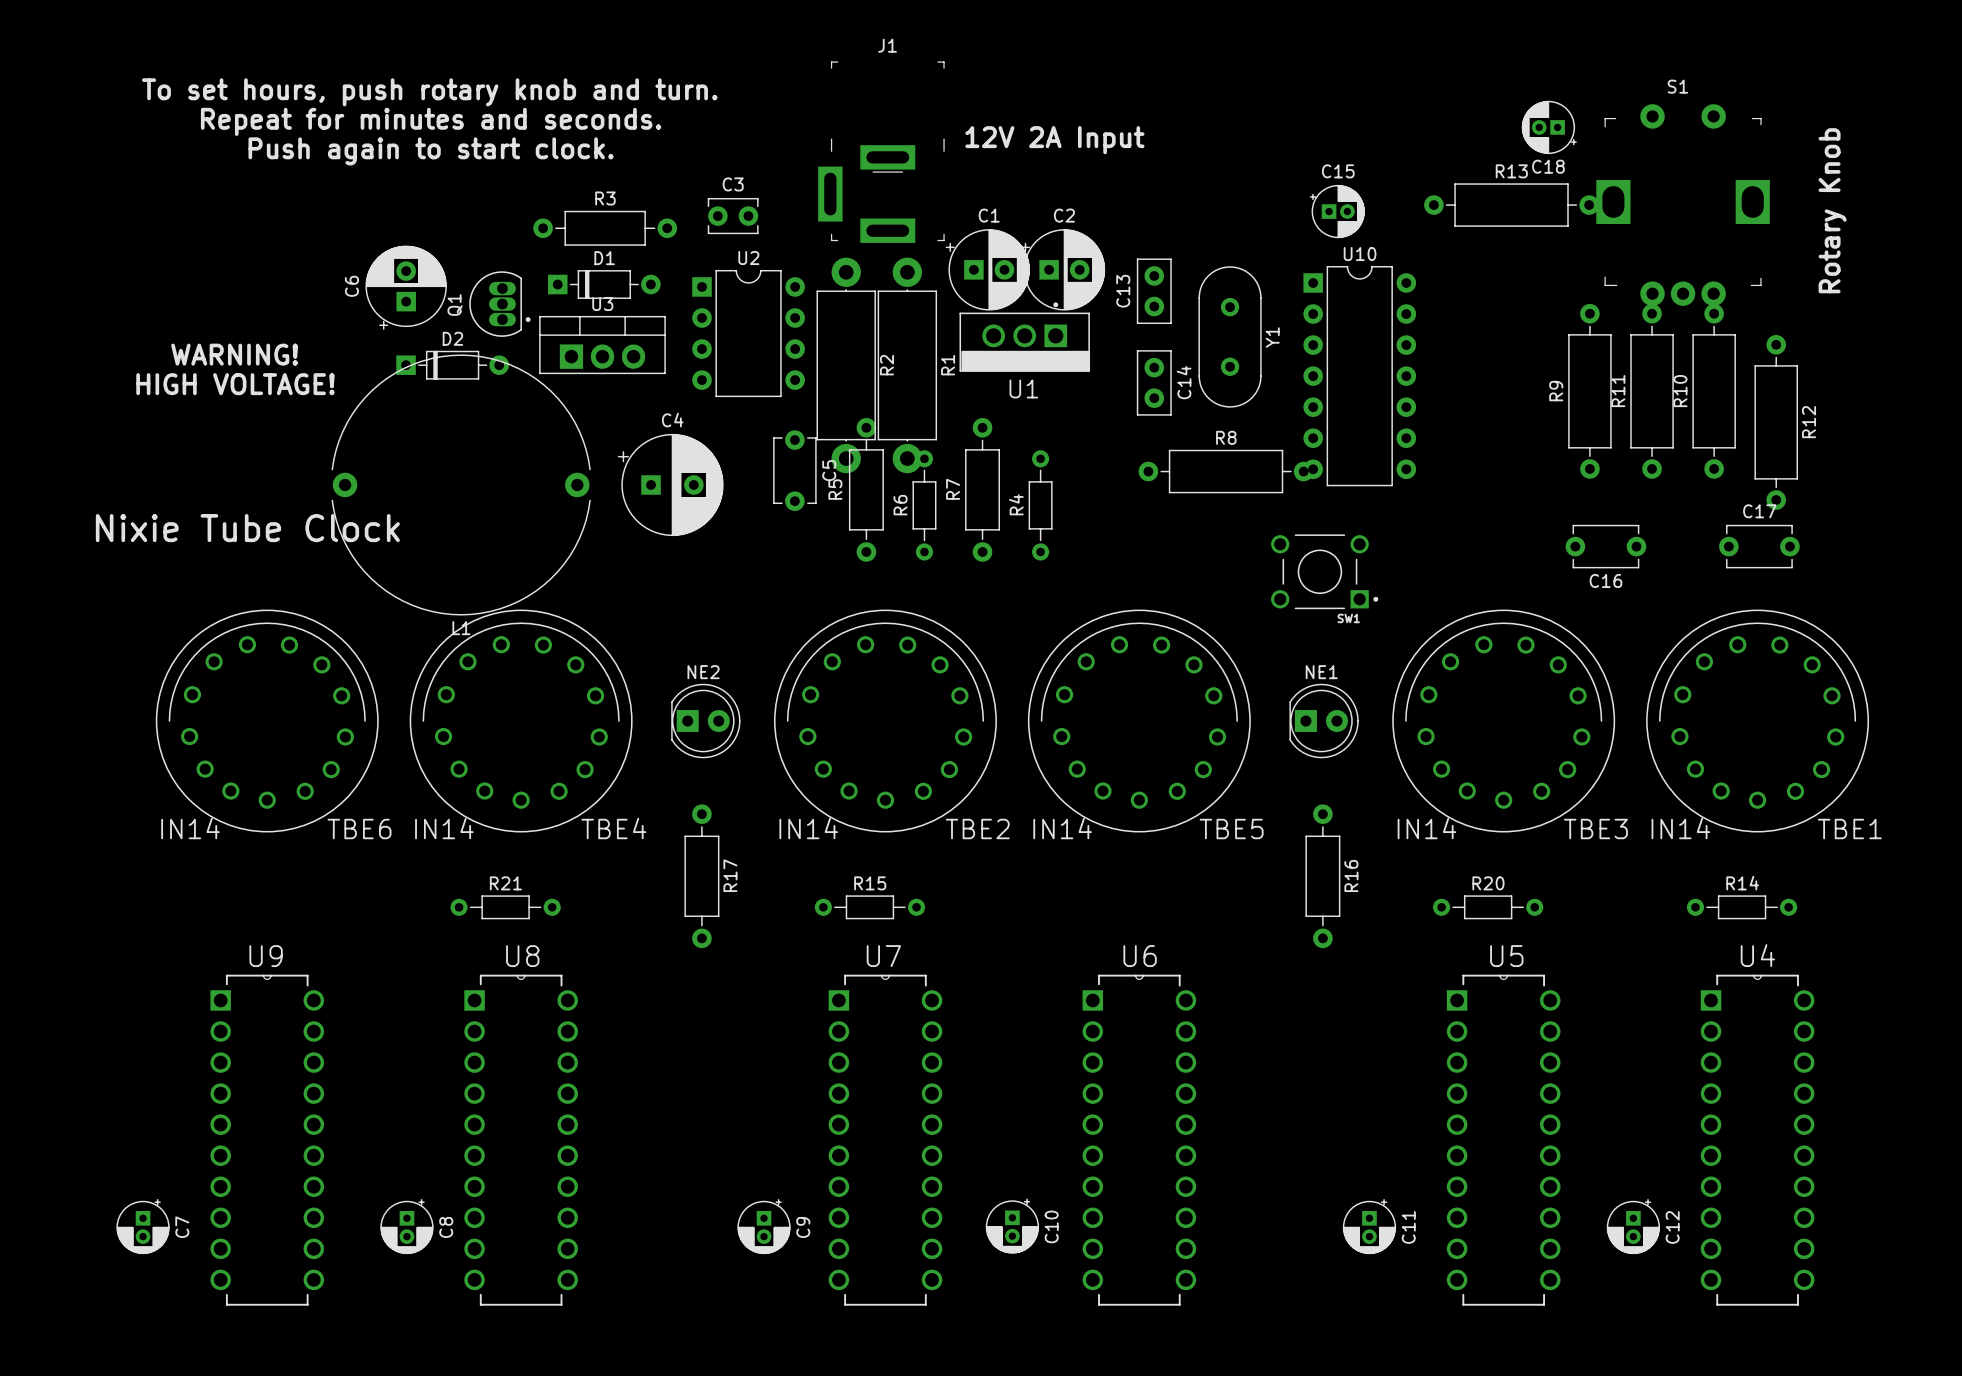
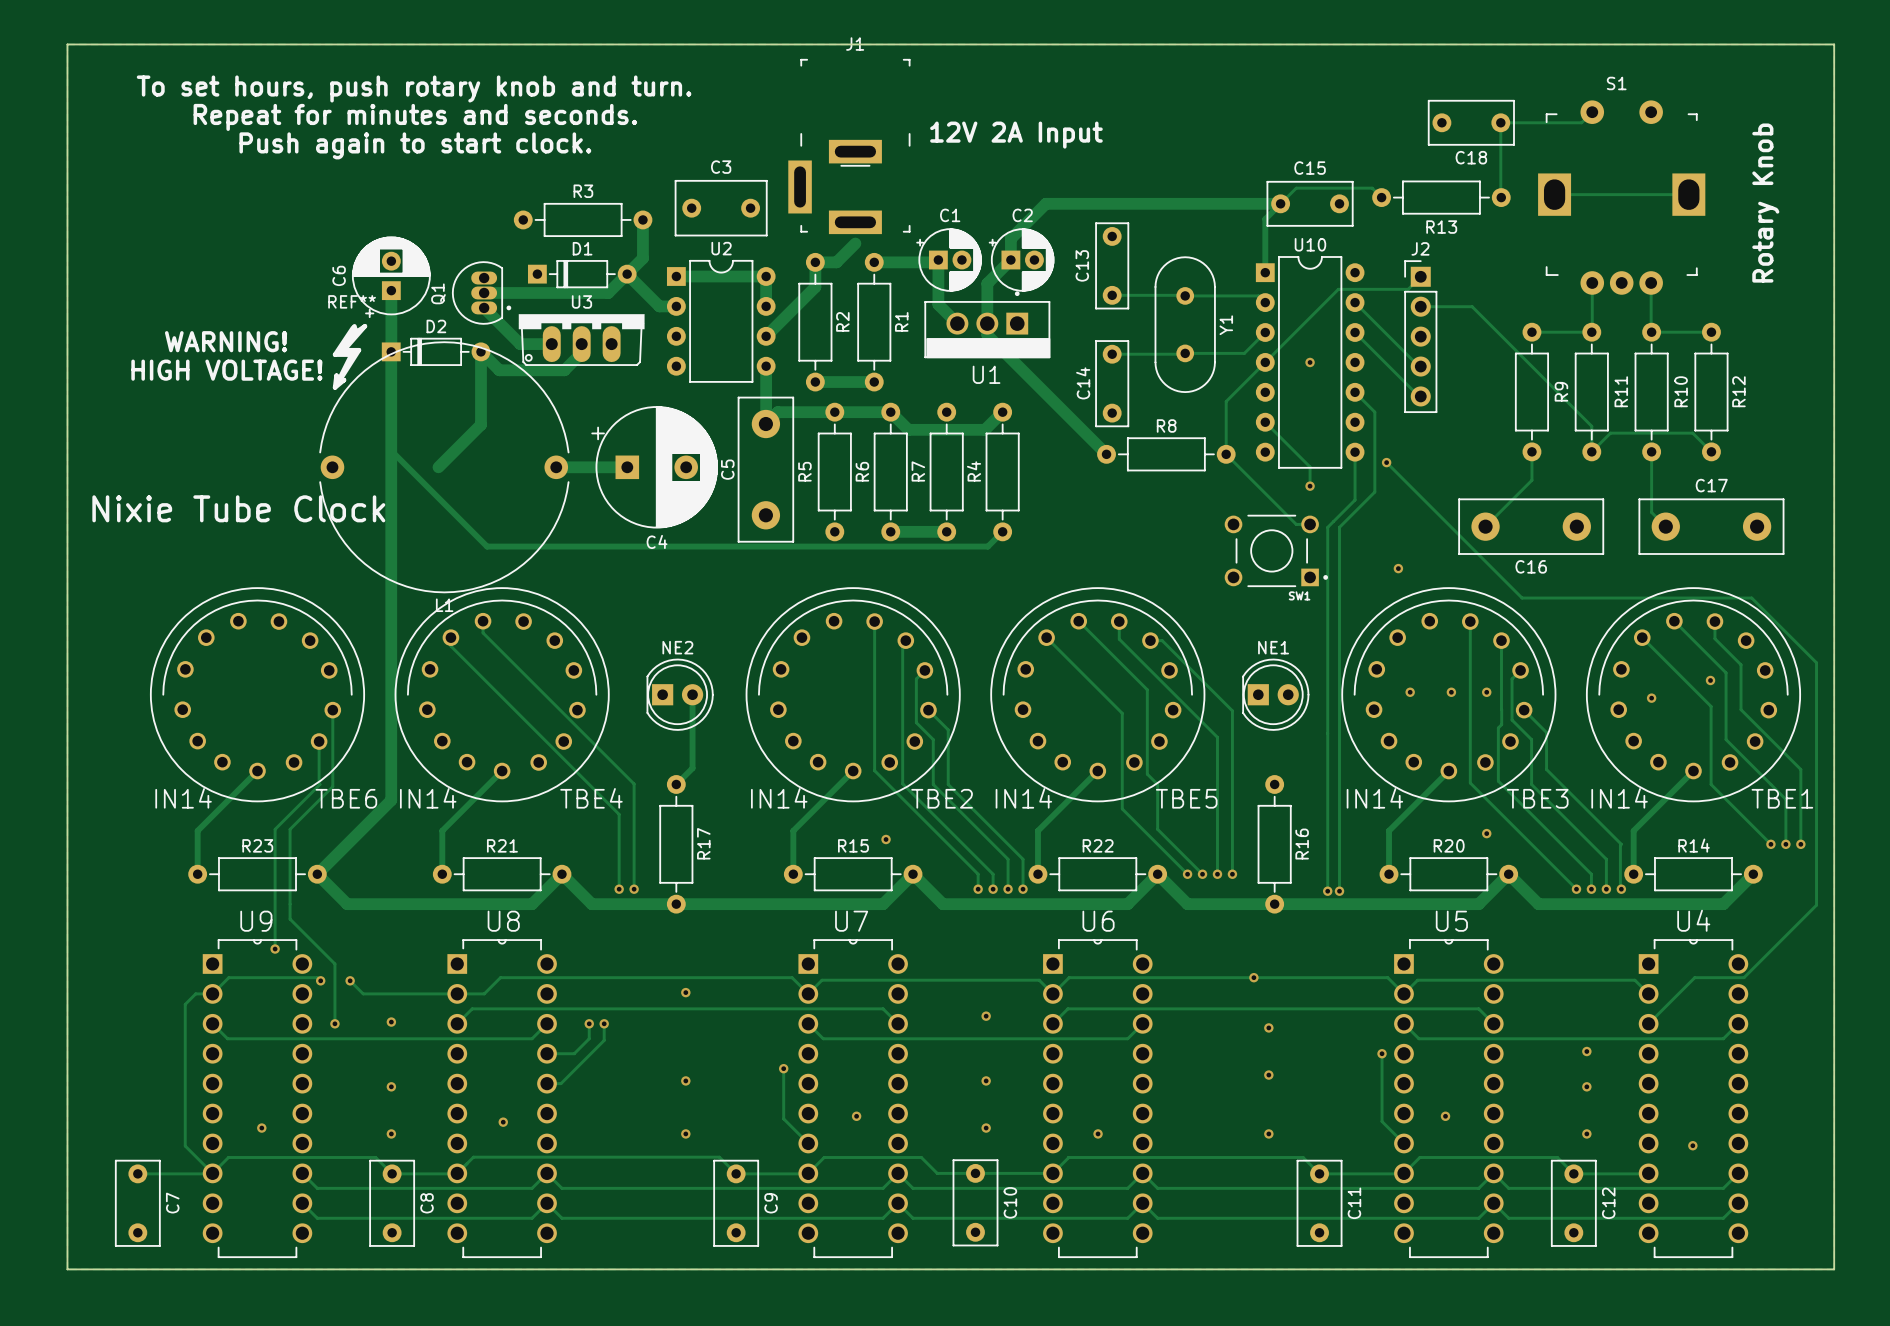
board edge: none -> (67, 44) (1834, 44) (1834, 1269) (67, 1269) (67, 44)
C18 footprint: [1521, 100, 1577, 155] -> [1428, 100, 1515, 146]
track: none -> (1592, 112) (1581, 122) (1500, 122) (1501, 197)
R13 name position: R13 (1511, 171) -> R13 (1441, 227)
R13 footprint: [1424, 183, 1599, 227] -> [1372, 180, 1511, 215]
C15 footprint: [1309, 184, 1365, 239] -> [1266, 181, 1354, 227]
C3 footprint: [707, 197, 759, 235] -> [674, 180, 768, 237]
track: none -> (1554, 194) (1688, 194)
track: none -> (1381, 197) (1372, 188) (1296, 188) (1280, 203)
track: none -> (1280, 203) (1045, 203) (1010, 238) (1010, 260) (987, 283) (987, 335) (1106, 454)
track: none -> (1280, 203) (1265, 219) (1265, 272)
track: none -> (642, 219) (642, 258) (608, 292) (484, 292)
C1 footprint: [945, 229, 1030, 311] -> [916, 228, 982, 292]
C2 footprint: [1020, 229, 1106, 311] -> [988, 228, 1055, 292]
track: none -> (855, 243) (836, 262) (815, 262) (815, 287) (766, 336)
R2 footprint: [816, 257, 876, 474] -> [798, 252, 833, 392]
R1 footprint: [877, 257, 938, 474] -> [857, 252, 892, 392]
C13 footprint: [1136, 258, 1172, 324] -> [1095, 222, 1130, 310]
track: none -> (876, 260) (874, 262) (936, 262) (938, 260) (938, 304) (957, 323)
track: none -> (627, 274) (659, 306) (676, 306)
track: none -> (676, 276) (766, 276) (766, 306)
track: none -> (1420, 276) (1408, 289) (1338, 289) (1226, 401) (1226, 454) (1296, 524) (1310, 524)
track: none -> (1592, 282) (1591, 332) (1531, 332)
track: none -> (1651, 282) (1651, 332) (1711, 332)
track: none -> (391, 290) (391, 351)
R9 footprint: [1568, 303, 1612, 479] -> [1515, 322, 1549, 462]
R11 footprint: [1630, 303, 1674, 479] -> [1574, 322, 1609, 462]
R10 footprint: [1692, 303, 1736, 479] -> [1634, 322, 1669, 462]
track: none -> (1112, 295) (1258, 295) (1265, 302)
track: none -> (1355, 302) (1420, 366)
U3 footprint: [539, 315, 666, 375] -> [518, 314, 645, 366]
track: none -> (1420, 306) (1472, 306) (1591, 426) (1591, 451) (1610, 433) (1692, 433) (1711, 451)
track: none -> (484, 307) (520, 344) (551, 344)
R12 footprint: [1754, 334, 1798, 510] -> [1694, 322, 1729, 462]
track: none -> (1265, 332) (1244, 353) (1112, 354)
track: none -> (1355, 332) (1420, 396)
J2: none -> (1420, 336)
C14 footprint: [1136, 350, 1172, 416] -> [1095, 340, 1130, 428]
track: none -> (581, 344) (581, 353) (564, 370) (499, 370) (480, 351) (480, 424) (438, 467)
REF**: none -> (350, 356)
via: none -> (1310, 362)
track: none -> (766, 366) (766, 423)
C14 name position: C14 (1184, 382) -> C14 (1083, 383)
R9 name position: R9 (1556, 391) -> R9 (1561, 391)
R11 name position: R11 (1618, 391) -> R11 (1621, 391)
R10 name position: R10 (1680, 391) -> R10 (1681, 391)
track: none -> (815, 382) (874, 382)
track: none -> (1355, 392) (1374, 412) (1374, 492) (1339, 527) (1339, 891)
C4 name position: C4 (672, 420) -> C4 (657, 541)
track: none -> (1002, 412) (984, 429) (908, 429) (890, 412) (777, 412) (765, 424)
C5 footprint: [773, 430, 817, 511] -> [737, 396, 794, 543]
C4 footprint: [617, 433, 724, 537] -> [591, 406, 718, 529]
track: none -> (1265, 422) (1310, 467) (1310, 486)
R8 footprint: [1138, 449, 1314, 494] -> [1097, 437, 1236, 472]
R6 footprint: [912, 450, 937, 561] -> [873, 402, 908, 542]
R4 footprint: [1028, 450, 1053, 561] -> [985, 402, 1020, 542]
track: none -> (1531, 451) (1531, 480) (1485, 526)
track: none -> (1651, 451) (1651, 512) (1665, 526)
track: none -> (1355, 452) (1355, 500) (1327, 527) (1327, 891)
C5 name position: C5 (829, 470) -> C5 (727, 469)
track: none -> (1386, 462) (1522, 598) (1751, 598) (1816, 662) (1816, 905) (1744, 977) (1694, 977) (1648, 1023)
via: none -> (1386, 462)
track: none -> (556, 467) (627, 467)
via: none -> (1310, 486)
C16 footprint: [1565, 524, 1647, 569] -> [1458, 498, 1604, 555]
C17 footprint: [1719, 524, 1800, 569] -> [1638, 498, 1785, 555]
track: none -> (890, 531) (946, 531)
track: none -> (1002, 531) (987, 546) (487, 546) (391, 450) (391, 351) (391, 800) (317, 874) (347, 904) (532, 904) (561, 874) (591, 904) (883, 904) (913, 874) (942, 904) (1127, 904) (1157, 874) (1187, 904) (1478, 904) (1508, 874) (1538, 904) (1723, 904) (1753, 874)
via: none -> (1398, 568)
track: none -> (483, 621) (483, 632) (634, 783) (634, 889)
track: none -> (1078, 621) (1147, 689) (1147, 774) (1157, 784) (1157, 829) (1202, 874)
track: none -> (1674, 621) (1726, 672) (1726, 739) (1785, 799) (1785, 844)
track: none -> (874, 621) (874, 770) (978, 874) (978, 889)
track: none -> (1119, 621) (1119, 639) (1217, 737) (1217, 874)
track: none -> (1470, 621) (1470, 783) (1576, 889)
track: none -> (1714, 621) (1714, 638) (1741, 664) (1741, 709) (1800, 769) (1800, 844)
track: none -> (450, 637) (450, 646) (619, 814) (619, 889)
track: none -> (1046, 637) (1122, 713) (1122, 808) (1187, 874)
track: none -> (1642, 637) (1711, 706) (1711, 784) (1770, 844)
track: none -> (905, 640) (902, 643) (902, 783) (993, 874) (993, 889)
track: none -> (1150, 640) (1162, 640) (1232, 710) (1232, 874)
track: none -> (1501, 640) (1501, 724) (1498, 727) (1498, 781) (1591, 874) (1591, 889)
track: none -> (924, 670) (916, 678) (916, 722) (933, 739) (933, 784) (1008, 859) (1008, 889)
track: none -> (1520, 670) (1512, 678) (1512, 720) (1531, 739) (1531, 784) (1606, 859) (1606, 889)
via: none -> (1710, 680)
via: none -> (1410, 692)
via: none -> (1451, 692)
via: none -> (1486, 692)
track: none -> (692, 694) (692, 768) (676, 784)
via: none -> (1651, 698)
track: none -> (332, 710) (332, 786) (290, 829) (290, 919) (334, 963) (334, 1023)
track: none -> (928, 710) (948, 729) (948, 784) (1023, 859) (1023, 889)
track: none -> (1524, 710) (1546, 732) (1546, 769) (1621, 844) (1621, 889)
track: none -> (319, 741) (319, 784) (275, 829) (275, 949)
track: none -> (257, 771) (197, 830) (197, 874)
track: none -> (502, 771) (442, 830) (442, 874)
track: none -> (853, 771) (793, 830) (793, 874)
track: none -> (1097, 771) (1037, 830) (1037, 874)
track: none -> (1448, 771) (1389, 830) (1389, 874)
track: none -> (1693, 771) (1633, 830) (1633, 874)
via: none -> (1486, 833)
via: none -> (886, 839)
via: none -> (1770, 844)
via: none -> (1785, 844)
via: none -> (1800, 844)
R21 footprint: [450, 895, 561, 920] -> [432, 857, 572, 892]
R15 footprint: [814, 895, 926, 920] -> [783, 857, 923, 892]
R20 footprint: [1433, 895, 1544, 920] -> [1379, 857, 1519, 892]
R14 footprint: [1686, 895, 1798, 920] -> [1624, 857, 1763, 892]
R23: none -> (257, 874)
R22: none -> (1097, 874)
via: none -> (1187, 874)
via: none -> (1202, 874)
via: none -> (1217, 874)
via: none -> (1232, 874)
via: none -> (619, 889)
via: none -> (634, 889)
via: none -> (978, 889)
via: none -> (993, 889)
via: none -> (1008, 889)
via: none -> (1023, 889)
via: none -> (1576, 889)
via: none -> (1591, 889)
via: none -> (1606, 889)
via: none -> (1621, 889)
via: none -> (1327, 891)
via: none -> (1339, 891)
via: none -> (275, 949)
via: none -> (1253, 977)
track: none -> (320, 980) (317, 977) (228, 977) (212, 993) (195, 993) (185, 1004) (185, 1146) (212, 1173)
via: none -> (320, 980)
track: none -> (350, 980) (363, 993) (484, 993) (500, 977) (792, 977) (808, 993) (821, 980) (1039, 980) (1052, 993) (1069, 977) (1387, 977) (1403, 993) (1417, 980) (1634, 980) (1648, 993)
via: none -> (350, 980)
via: none -> (685, 992)
via: none -> (986, 1016)
via: none -> (391, 1022)
track: none -> (212, 1023) (227, 1038) (532, 1038) (547, 1023)
via: none -> (334, 1023)
track: none -> (457, 1023) (472, 1008) (883, 1008) (898, 1023)
track: none -> (589, 1023) (589, 1038) (574, 1053) (547, 1053)
via: none -> (589, 1023)
track: none -> (604, 1023) (604, 1040) (560, 1083) (547, 1083)
via: none -> (604, 1023)
track: none -> (808, 1023) (823, 1038) (1127, 1038) (1142, 1023)
track: none -> (1052, 1023) (1067, 1008) (1478, 1008) (1493, 1023)
track: none -> (1403, 1023) (1418, 1038) (1723, 1038) (1738, 1023)
via: none -> (1268, 1027)
via: none -> (1586, 1051)
track: none -> (1382, 1053) (1382, 1121) (1403, 1143)
via: none -> (1382, 1053)
track: none -> (783, 1068) (783, 1118) (808, 1143)
via: none -> (783, 1068)
via: none -> (1268, 1075)
via: none -> (685, 1080)
via: none -> (986, 1080)
via: none -> (391, 1086)
via: none -> (1586, 1086)
via: none -> (856, 1116)
via: none -> (1445, 1116)
via: none -> (503, 1122)
via: none -> (261, 1128)
via: none -> (986, 1128)
via: none -> (391, 1133)
via: none -> (685, 1133)
via: none -> (1098, 1133)
via: none -> (1268, 1133)
via: none -> (1586, 1133)
via: none -> (1692, 1145)
C7 footprint: [116, 1198, 170, 1255] -> [115, 1159, 161, 1247]
C8 footprint: [380, 1198, 434, 1255] -> [369, 1159, 415, 1247]
C9 footprint: [737, 1198, 791, 1255] -> [713, 1159, 759, 1247]
C10 footprint: [985, 1198, 1040, 1254] -> [952, 1159, 999, 1247]
C11 footprint: [1342, 1198, 1397, 1255] -> [1296, 1159, 1343, 1247]
C12 footprint: [1606, 1198, 1661, 1255] -> [1551, 1159, 1597, 1247]
track: none -> (1068, 1157) (1303, 1157) (1319, 1173) (1403, 1173) (1419, 1157) (1557, 1157) (1573, 1173) (1648, 1173)
track: none -> (1068, 1157) (1052, 1173) (937, 1173) (921, 1157) (824, 1157) (807, 1173) (736, 1173) (719, 1157) (473, 1157) (456, 1173) (392, 1173) (375, 1157) (228, 1157) (212, 1173) (137, 1173)
track: none -> (302, 1173) (317, 1188) (532, 1188) (547, 1173) (561, 1188) (883, 1188) (898, 1173) (913, 1188) (1127, 1188) (1142, 1173) (1157, 1188) (1478, 1188) (1493, 1173) (1508, 1188) (1723, 1188) (1738, 1173)
track: none -> (302, 1203) (317, 1218) (532, 1218) (547, 1203) (561, 1218) (883, 1218) (898, 1203) (913, 1218) (1127, 1218) (1142, 1203) (1157, 1218) (1478, 1218) (1493, 1203) (1508, 1218) (1723, 1218) (1738, 1203)

